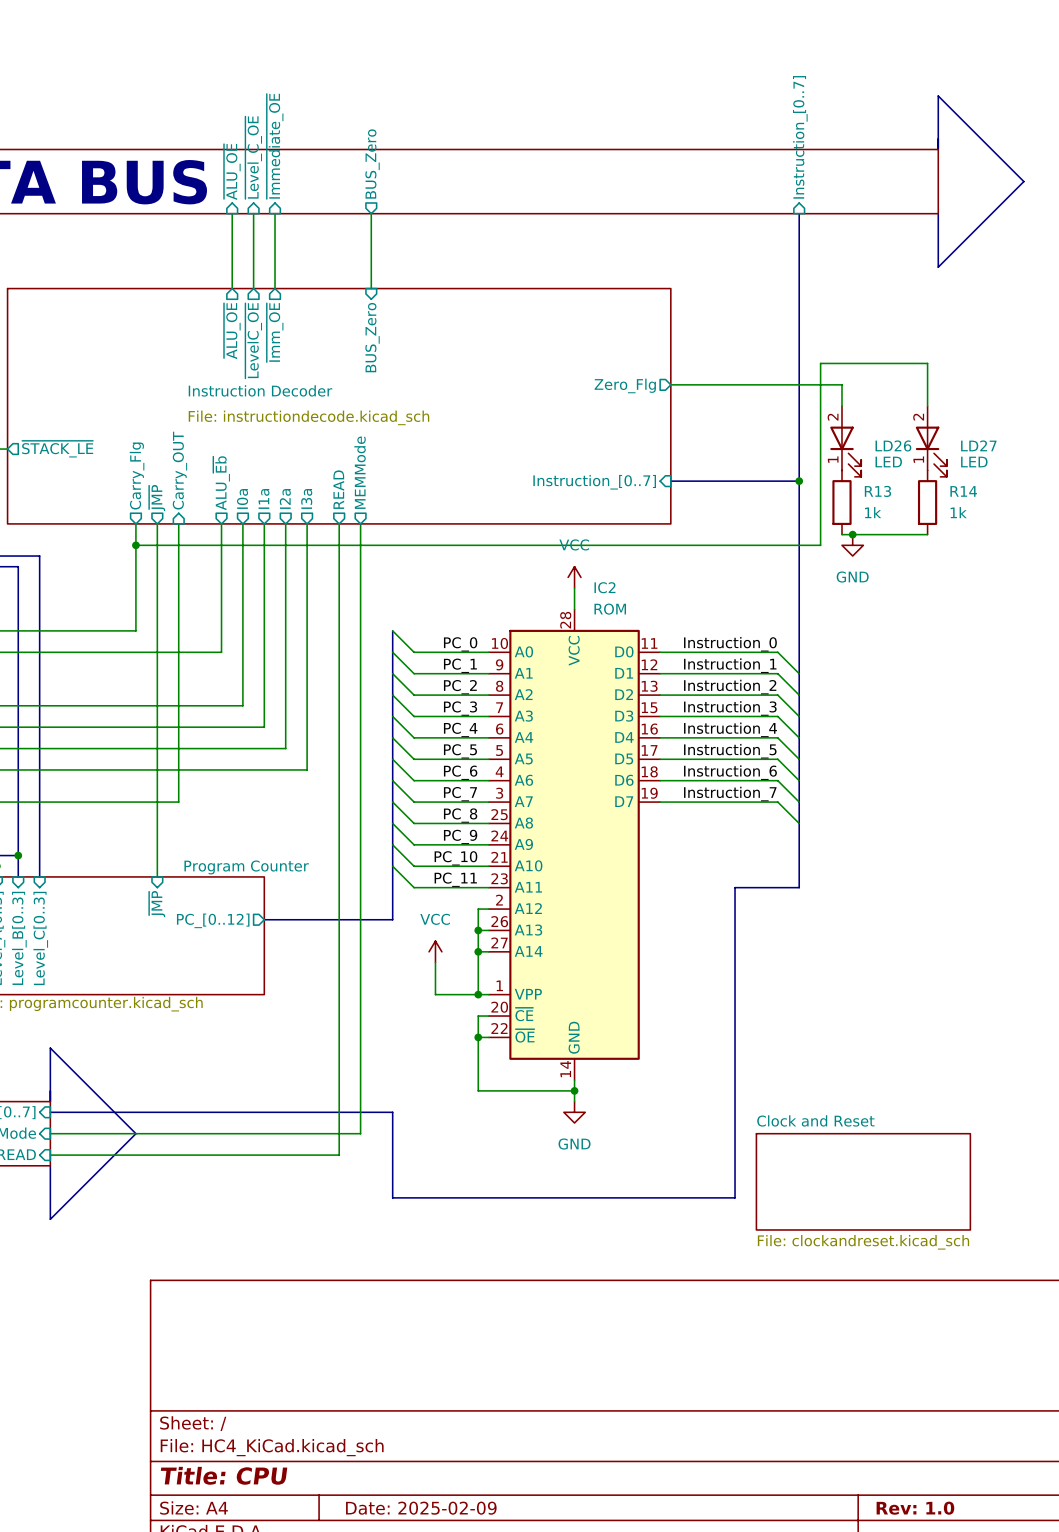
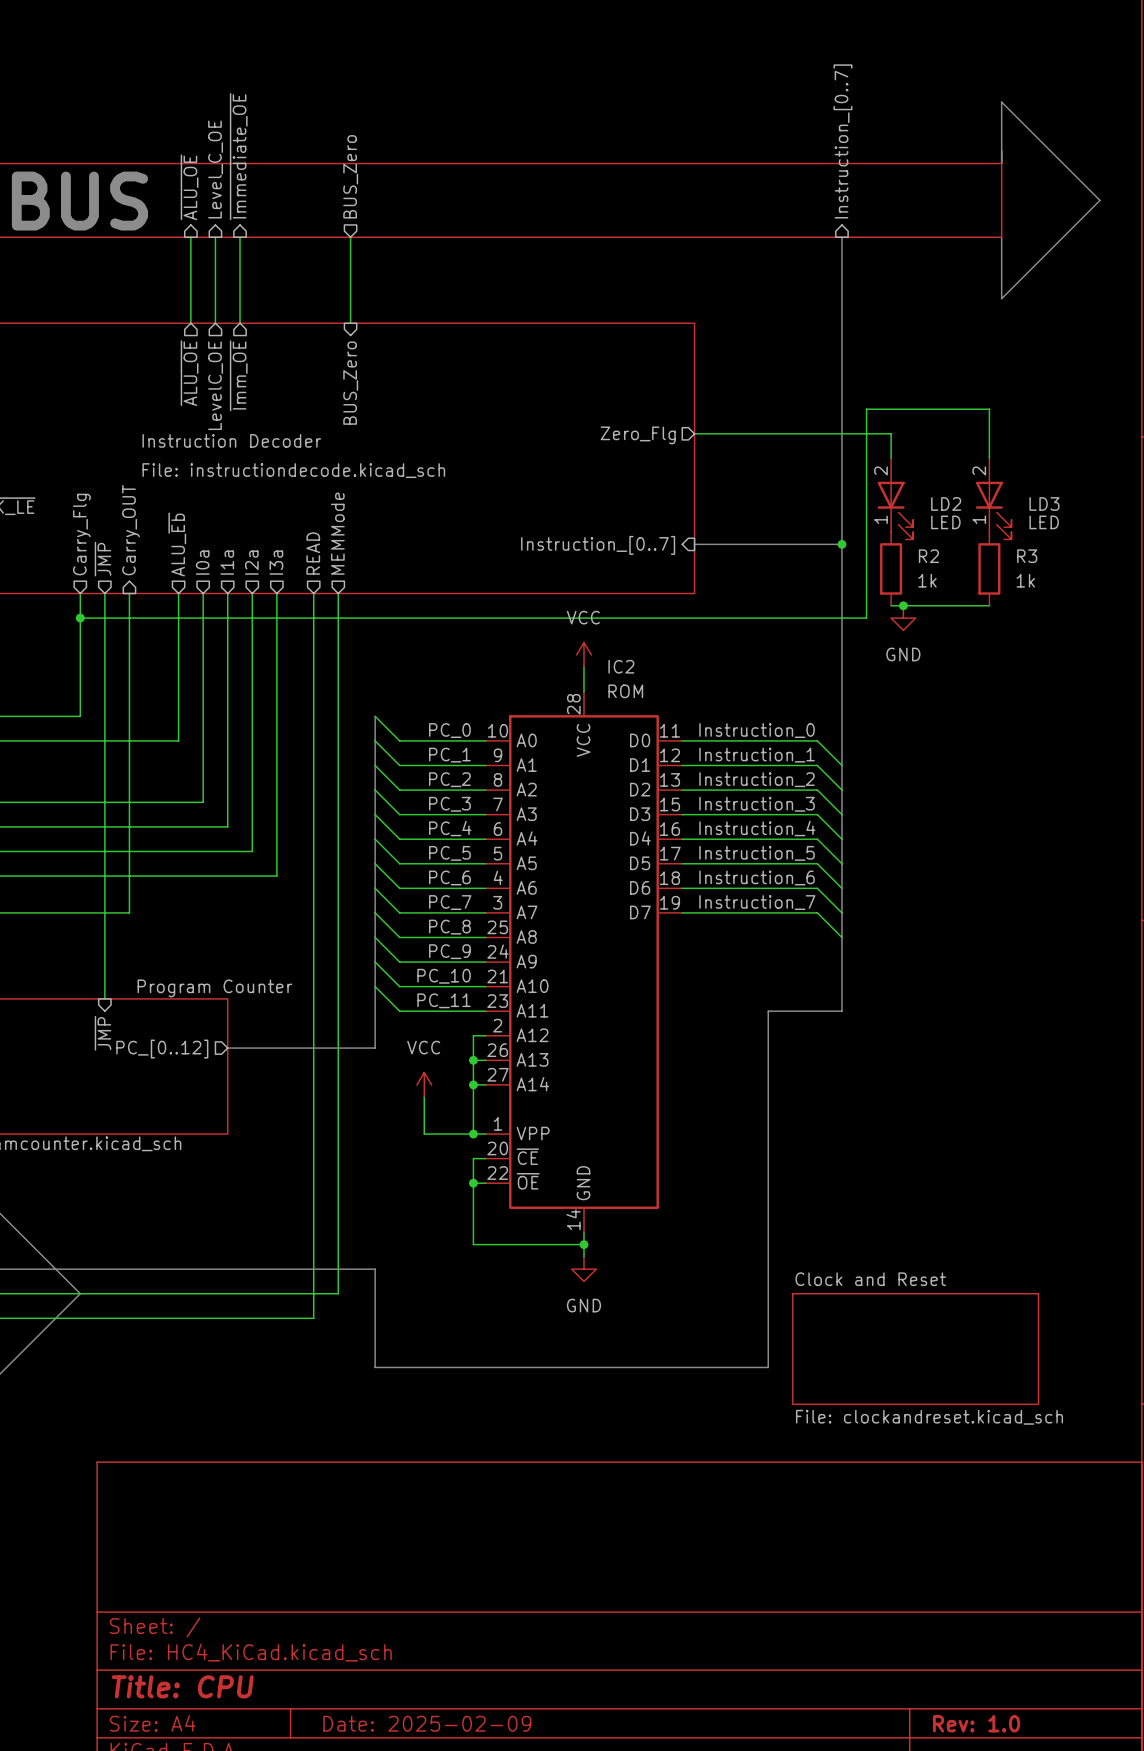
sheet pin: ~{Level_C_OE} (253, 157) -> Level_C_OE (215, 169)
sheet pin: ~{LevelC_OE} (253, 340) -> LevelC_OE (215, 385)
LD26 name: LD26 (893, 445) -> LD2 (946, 503)
LD27 name: LD27 (978, 445) -> LD3 (1044, 503)
R13 name: R13 (877, 491) -> R2 (928, 556)
R14 name: R14 (963, 491) -> R3 (1027, 556)

